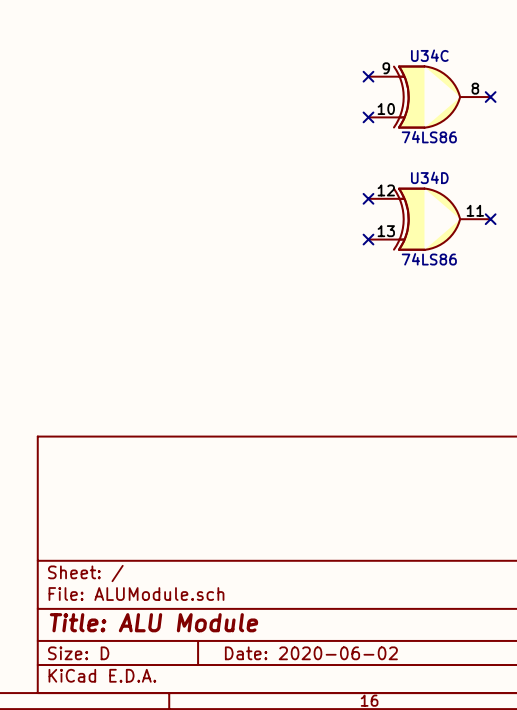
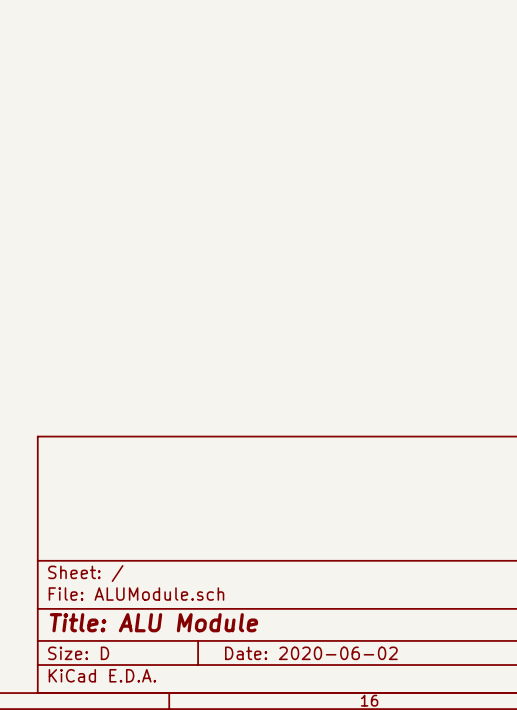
no-connect mark: (368, 76) -> none
U34C: 74LS86 (429, 97) -> none
no-connect mark: (490, 97) -> none
no-connect mark: (368, 117) -> none
no-connect mark: (368, 198) -> none
U34D: 74LS86 (429, 219) -> none
no-connect mark: (490, 219) -> none
no-connect mark: (368, 239) -> none

